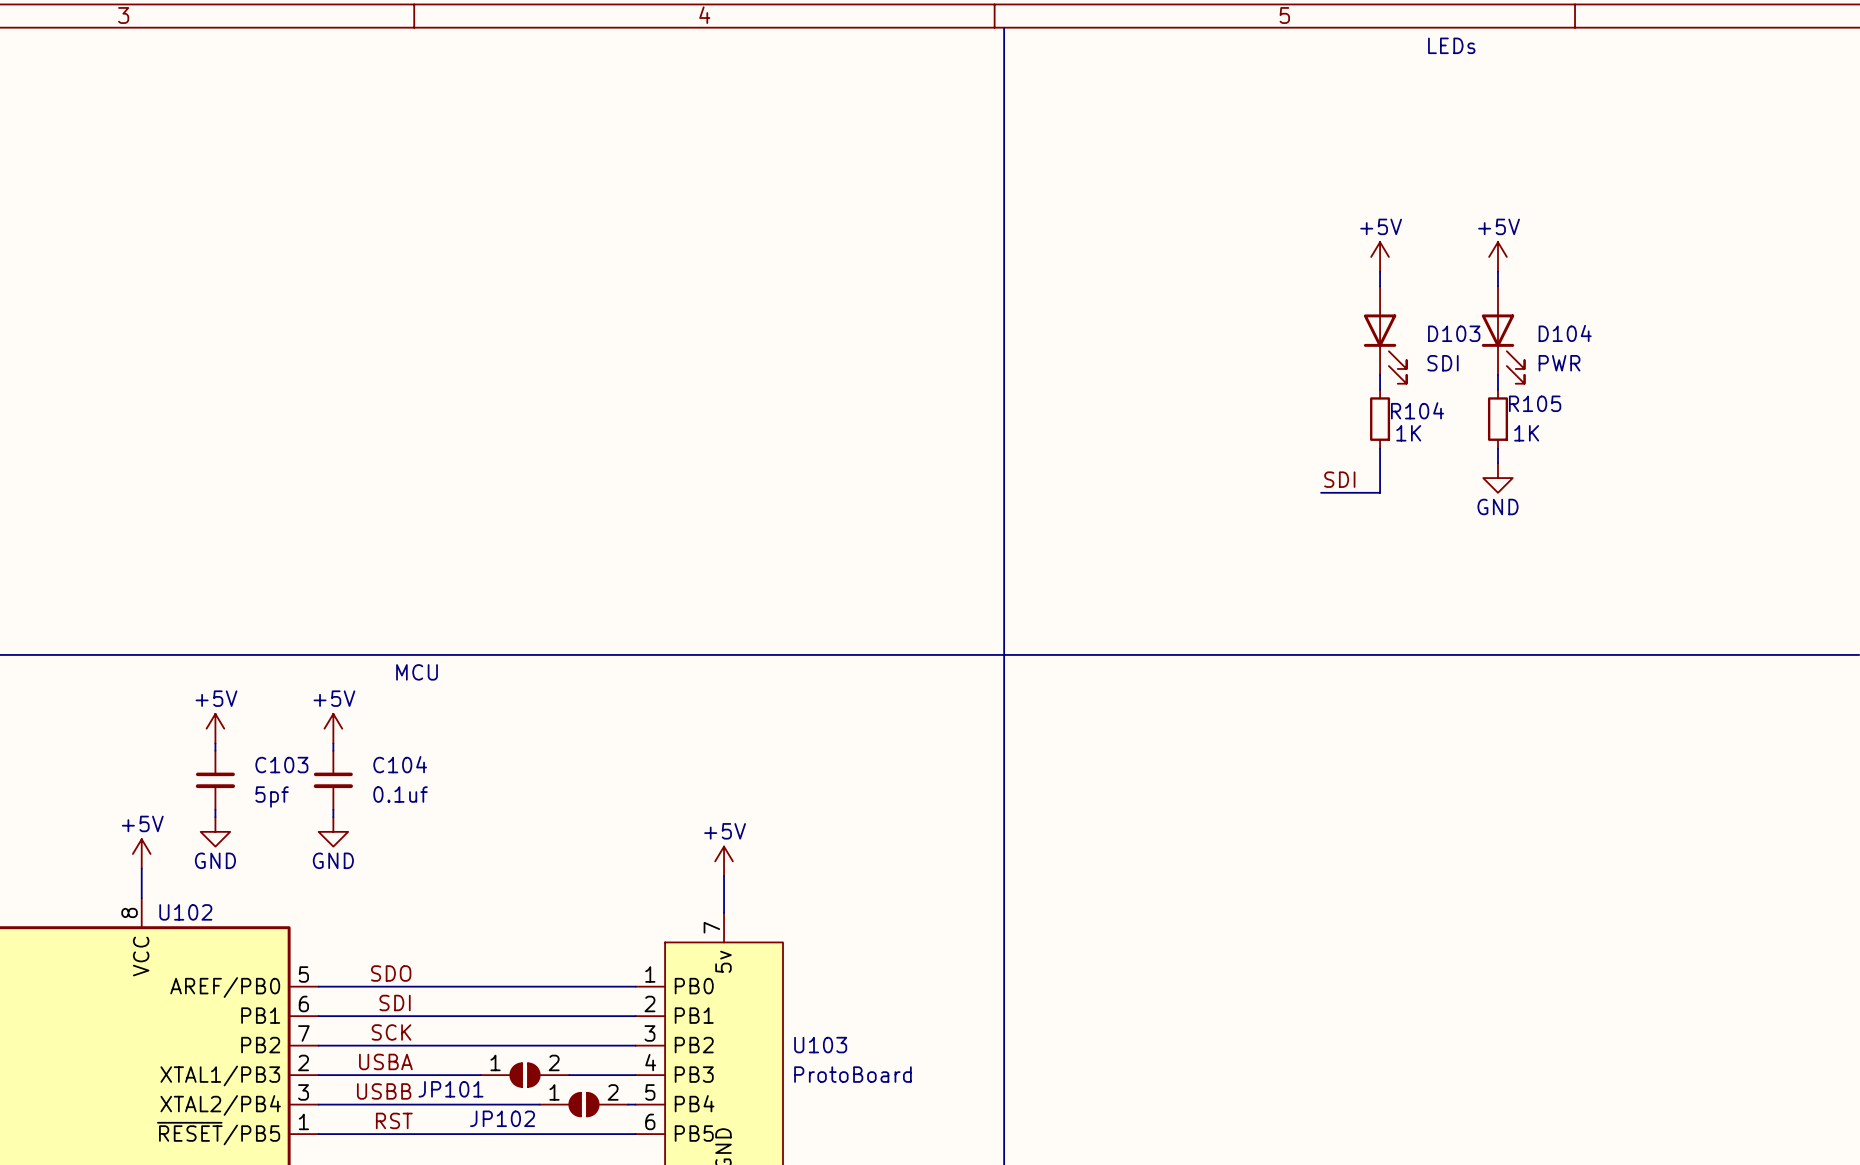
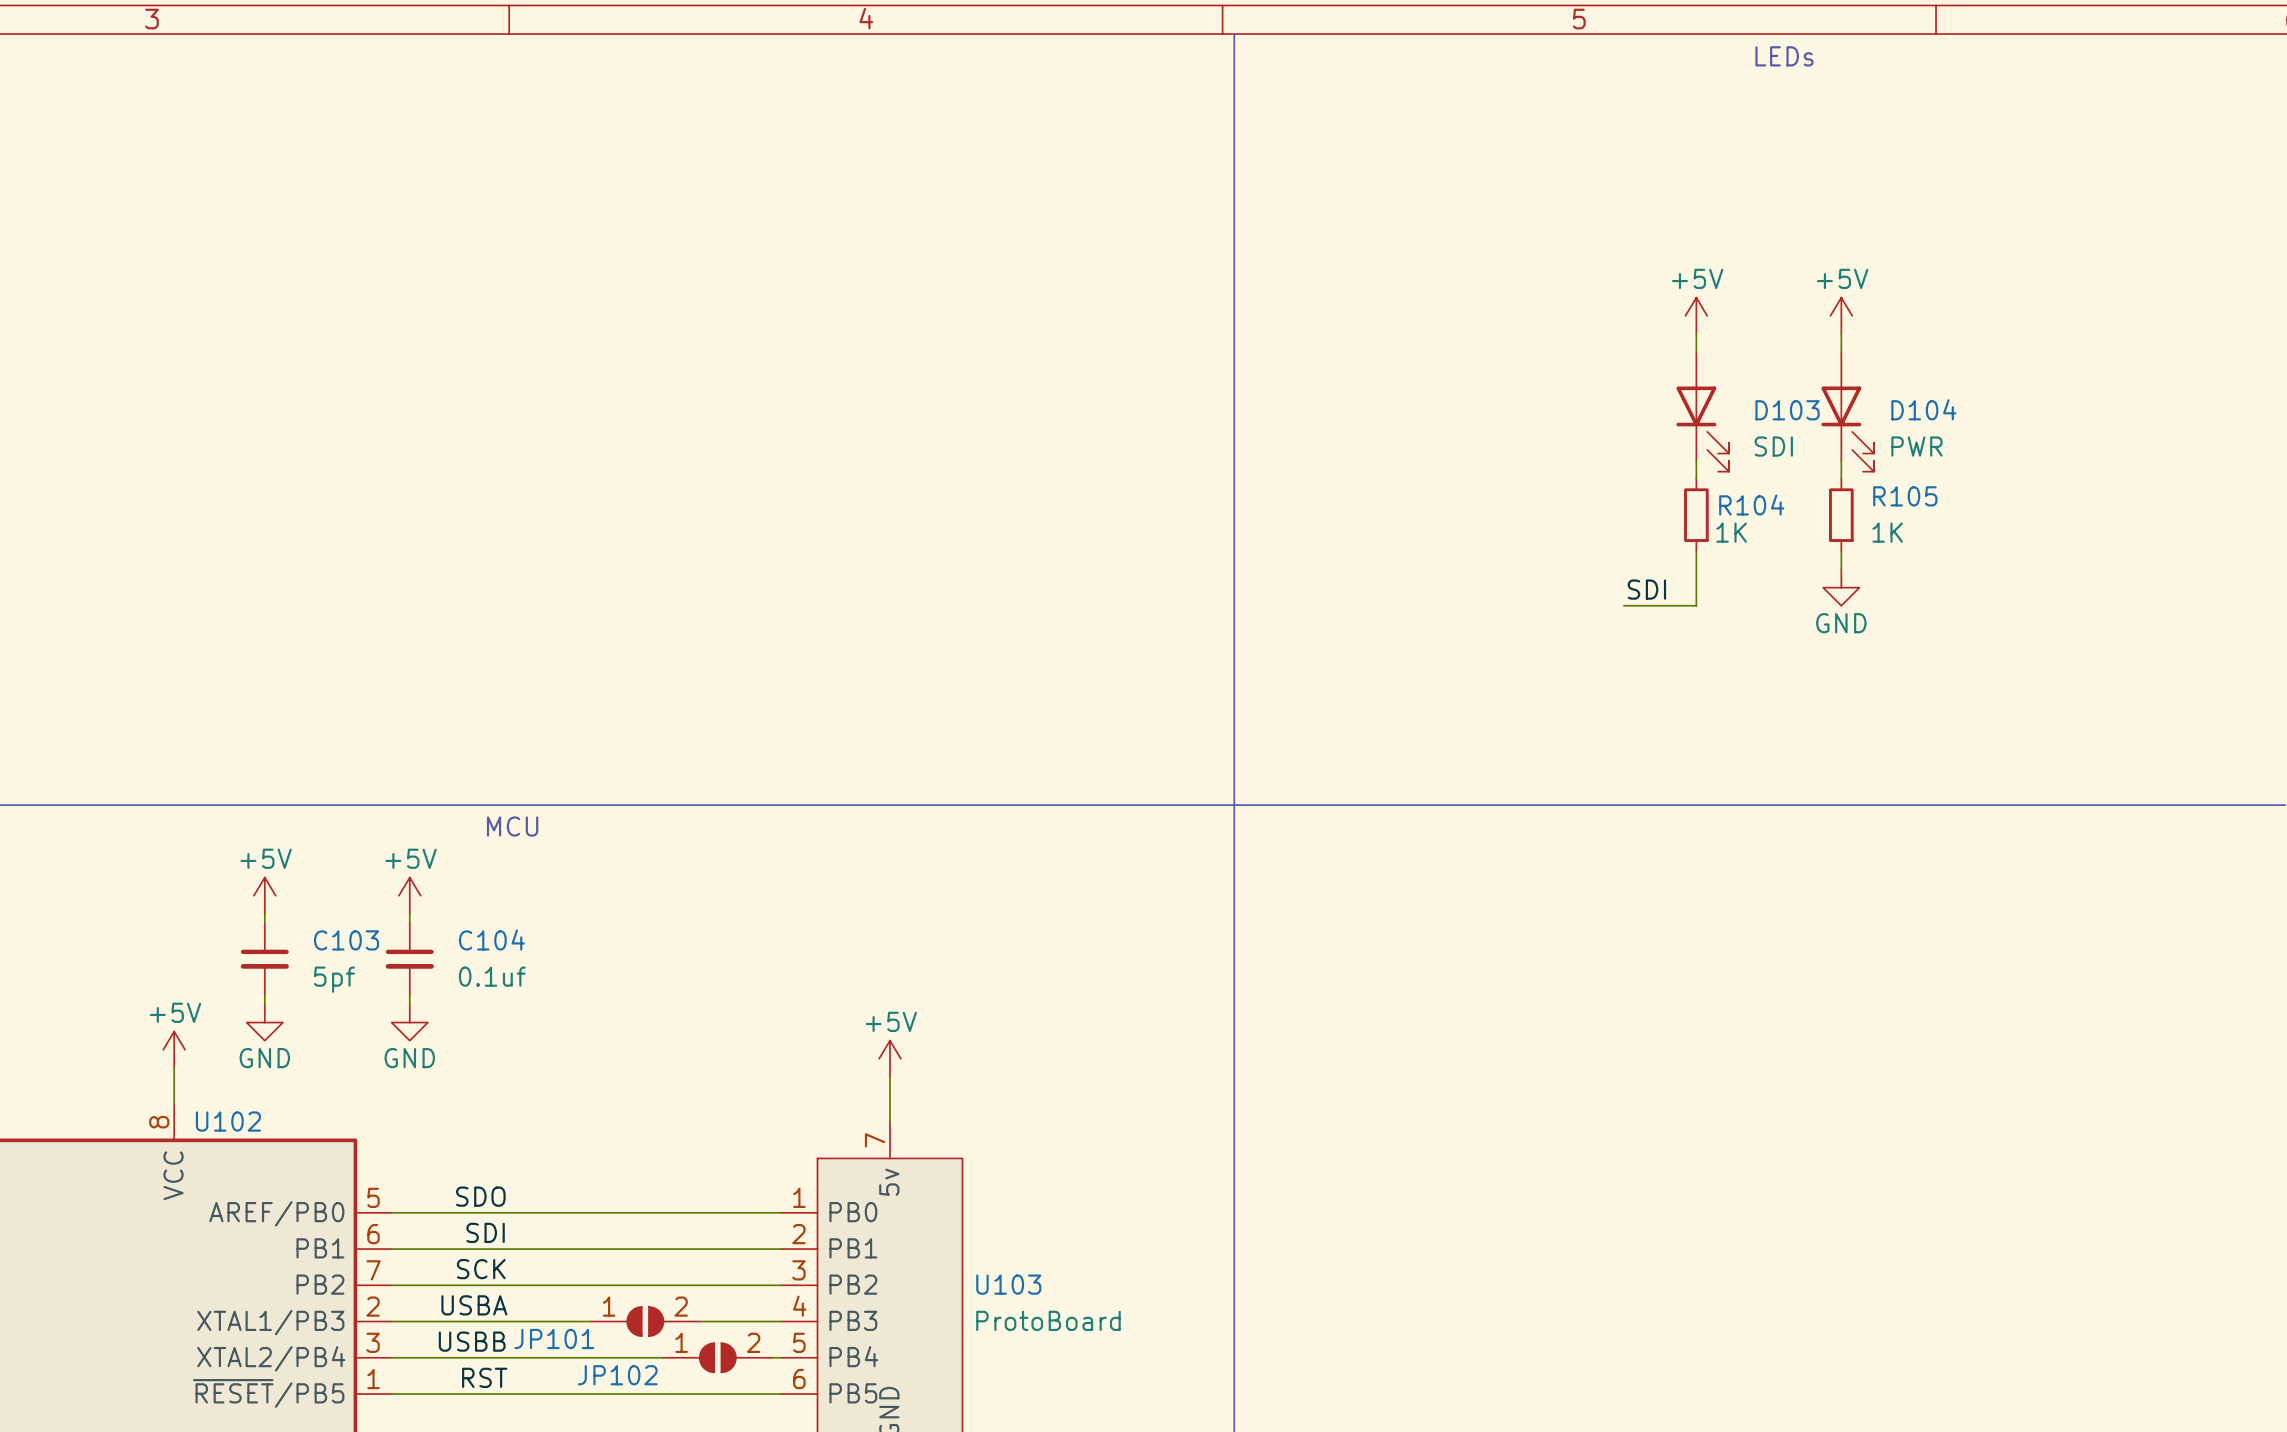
R105 name position: R105 (1535, 403) -> R105 (1905, 496)
R104 name position: R104 (1417, 410) -> R104 (1751, 504)
R105 value position: 1K (1526, 433) -> 1K (1887, 532)

